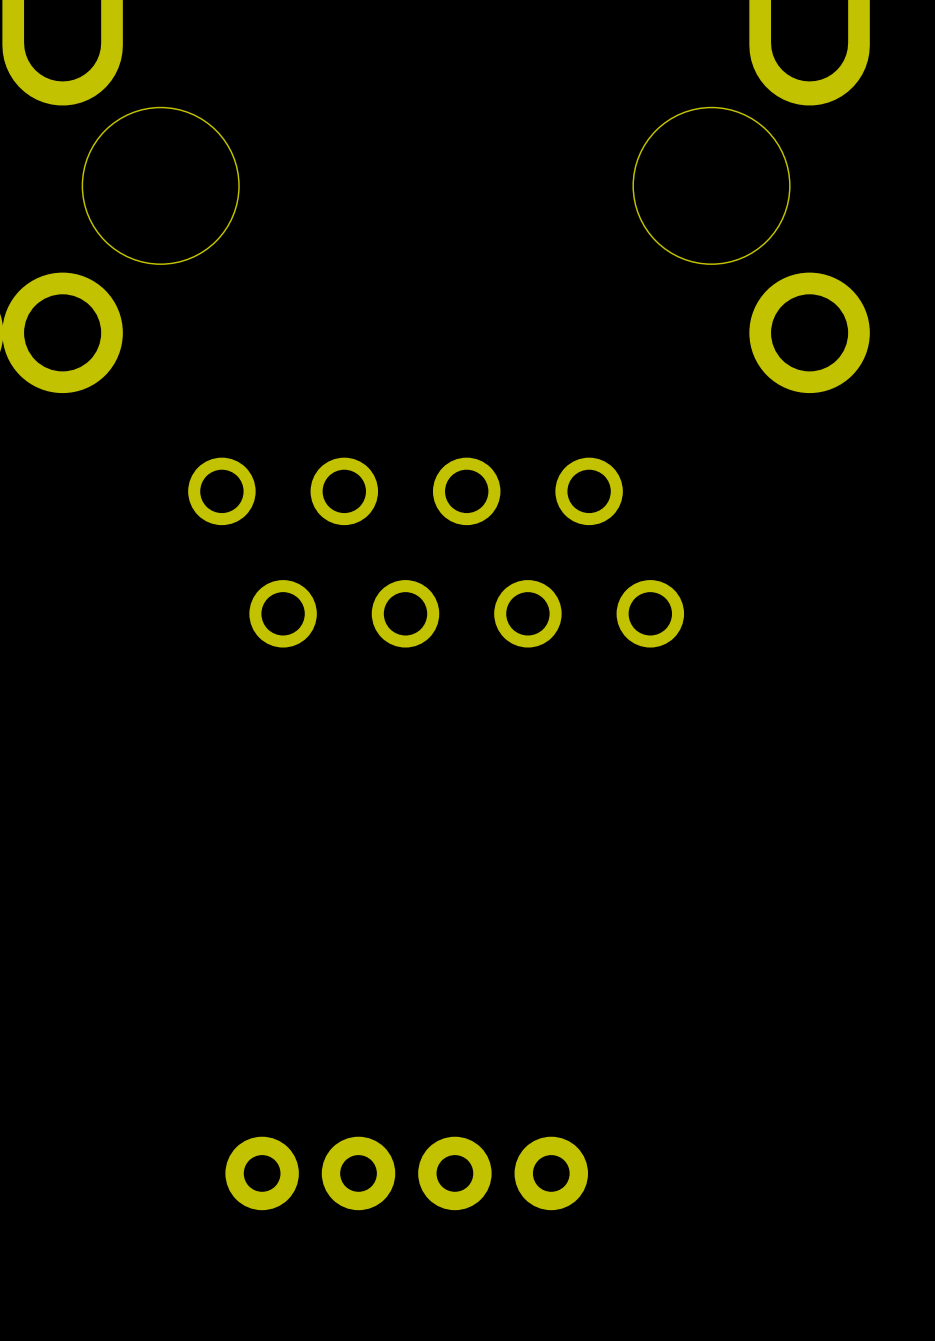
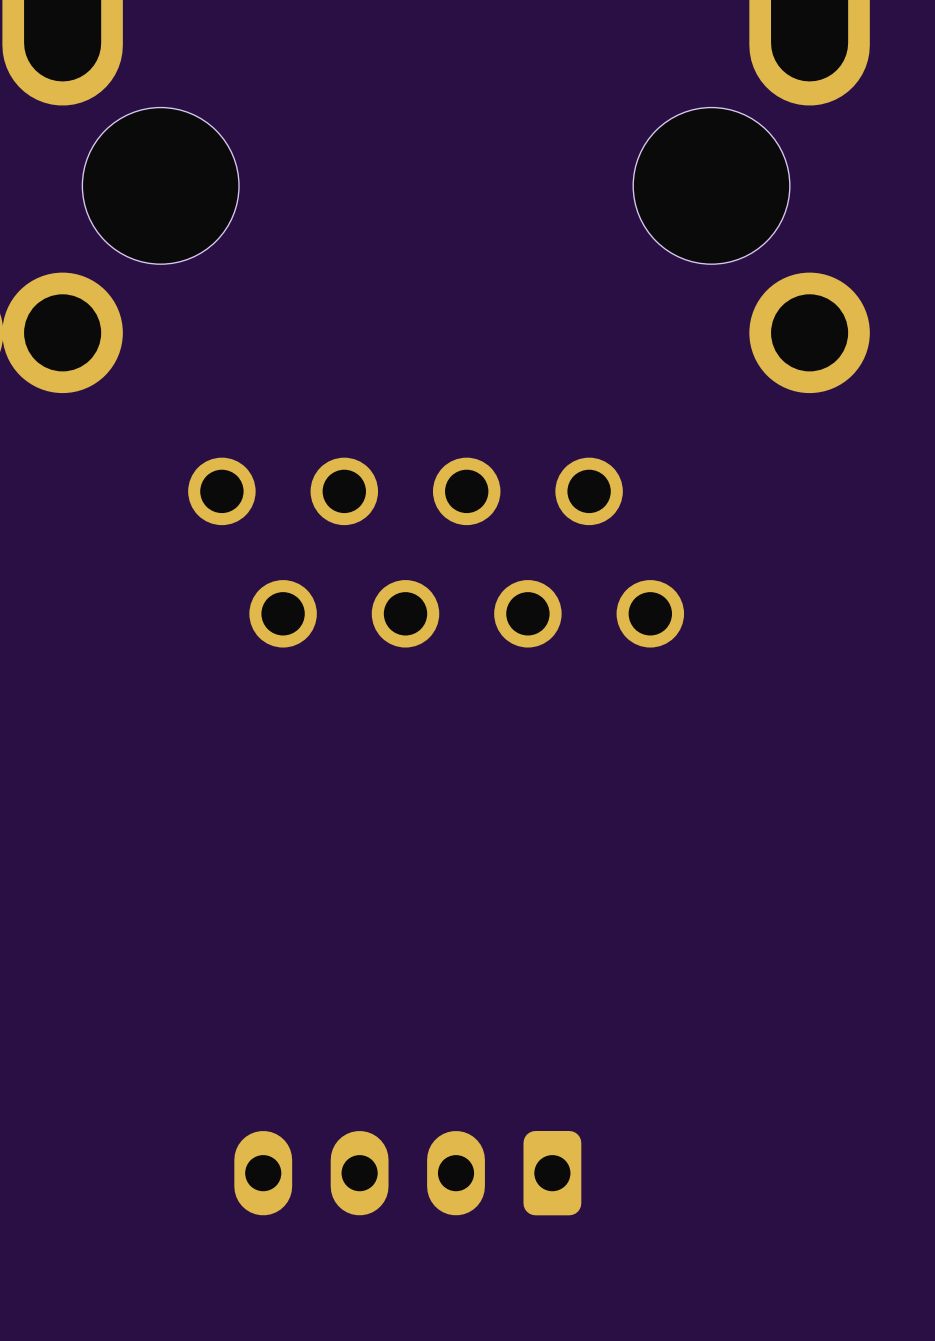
part footprint: [225, 1136, 589, 1211] -> [234, 1130, 582, 1216]

